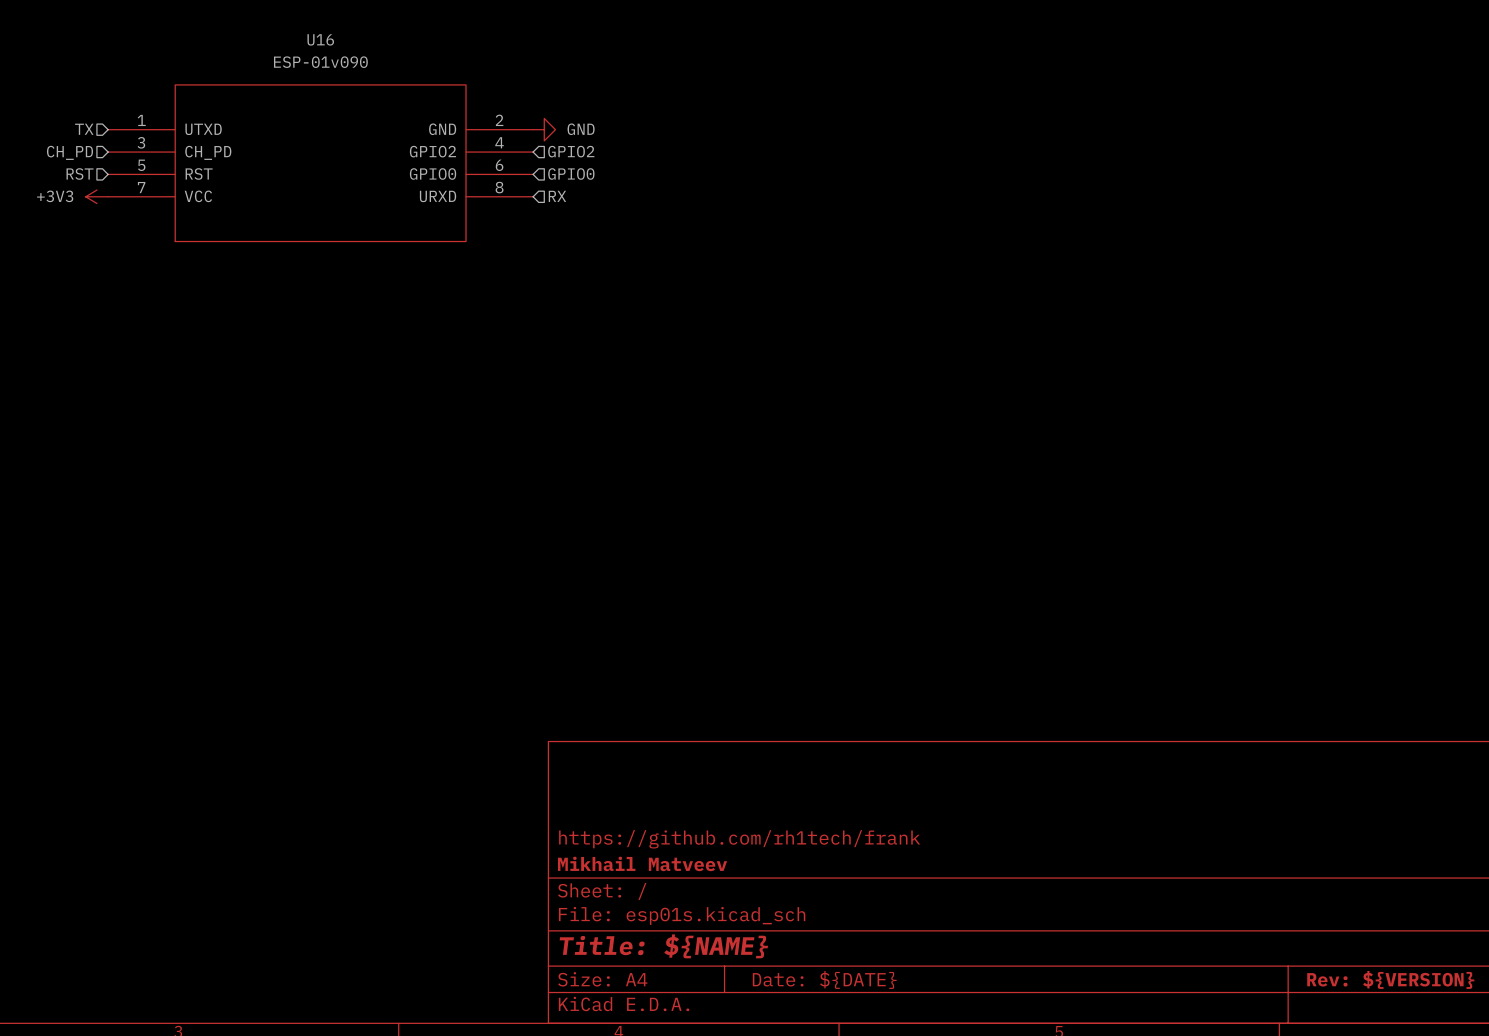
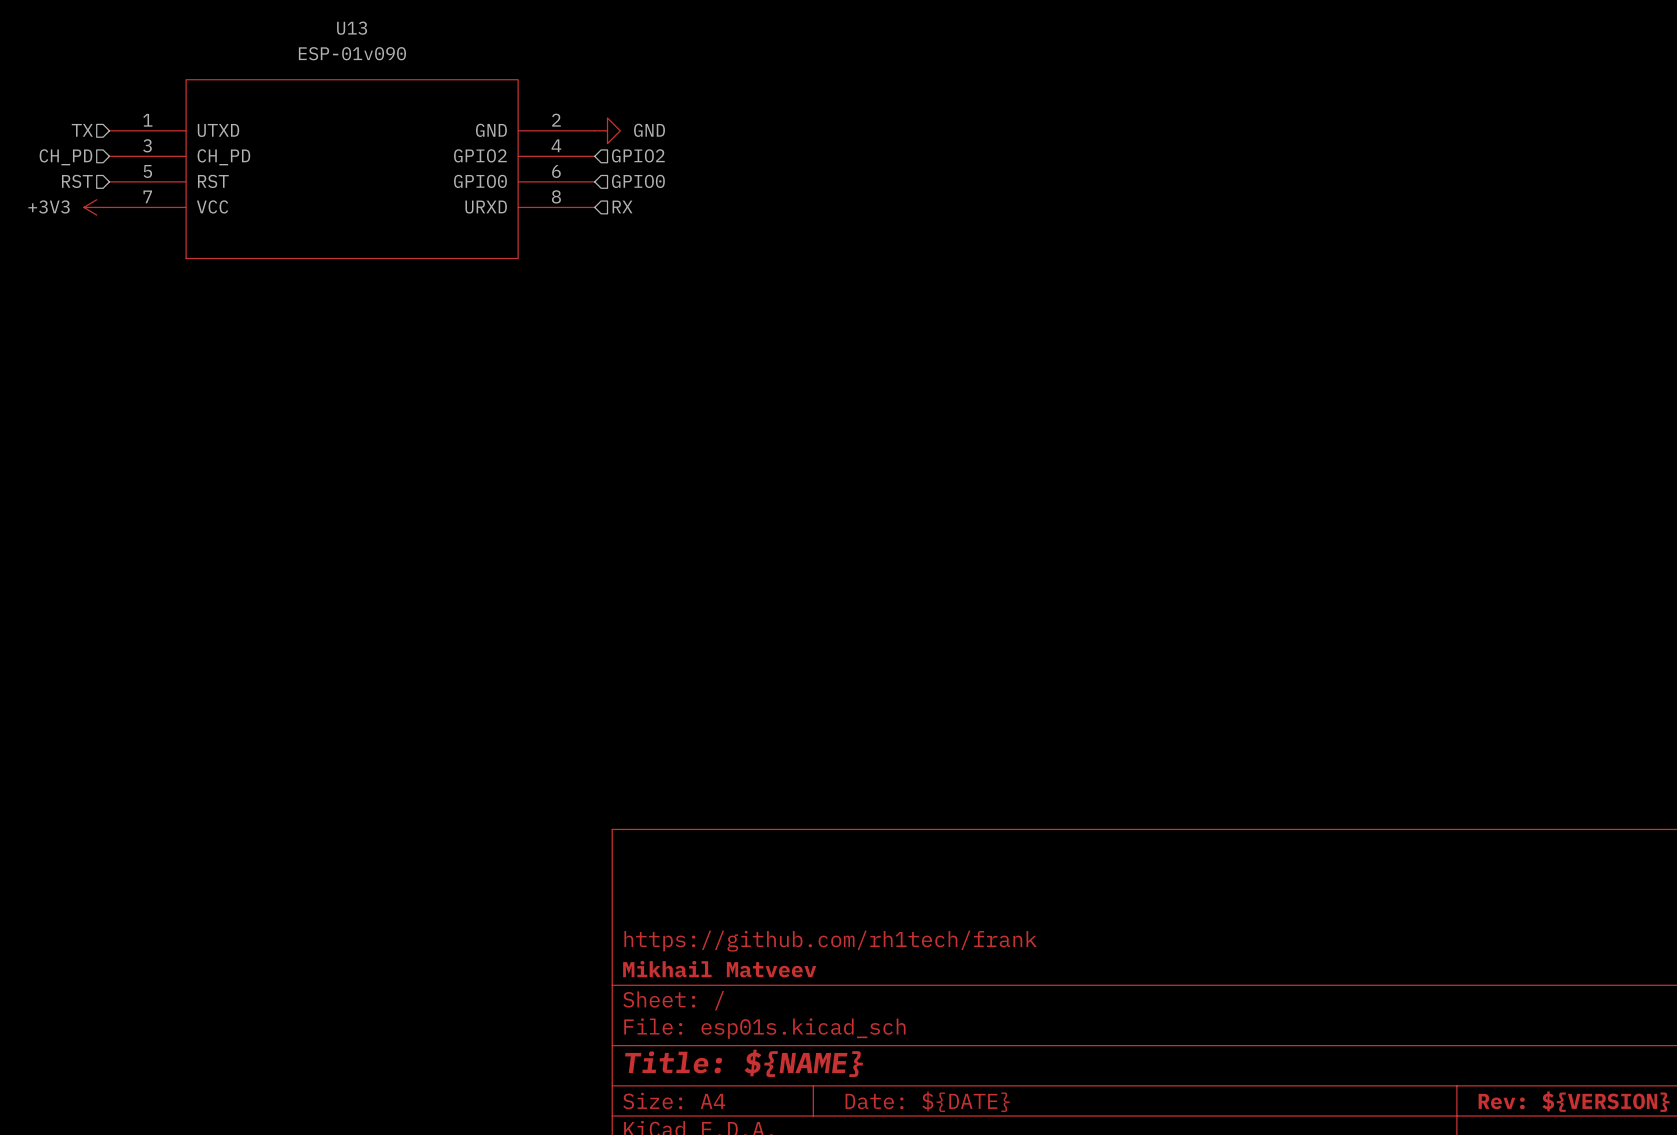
U16 name: U16 (320, 39) -> U13 (352, 28)

